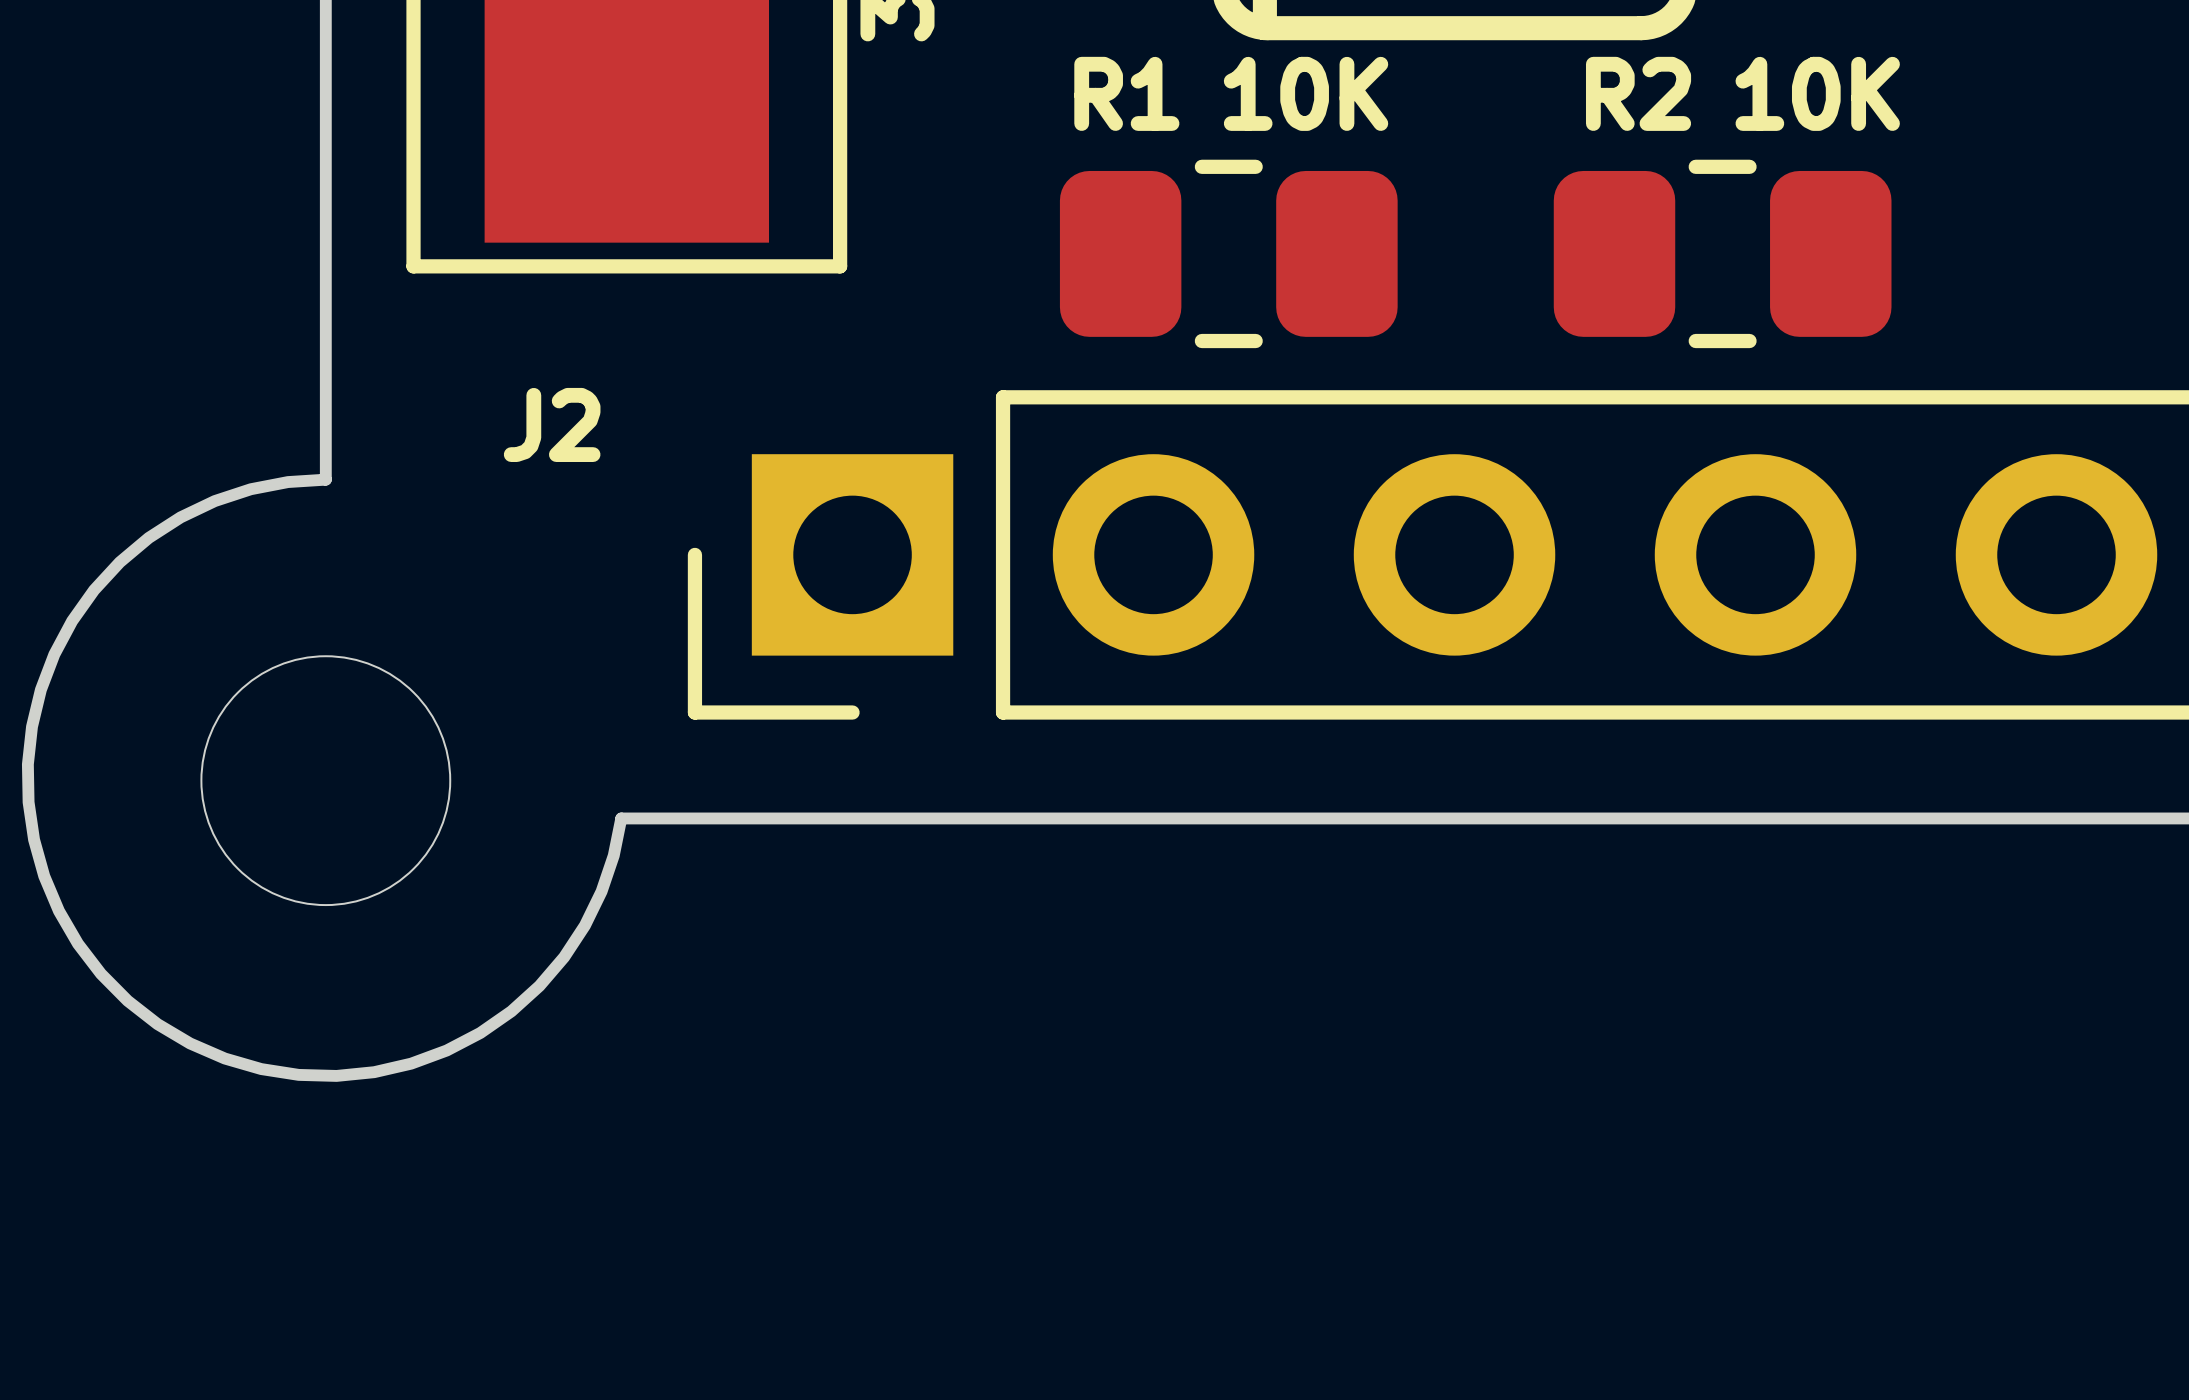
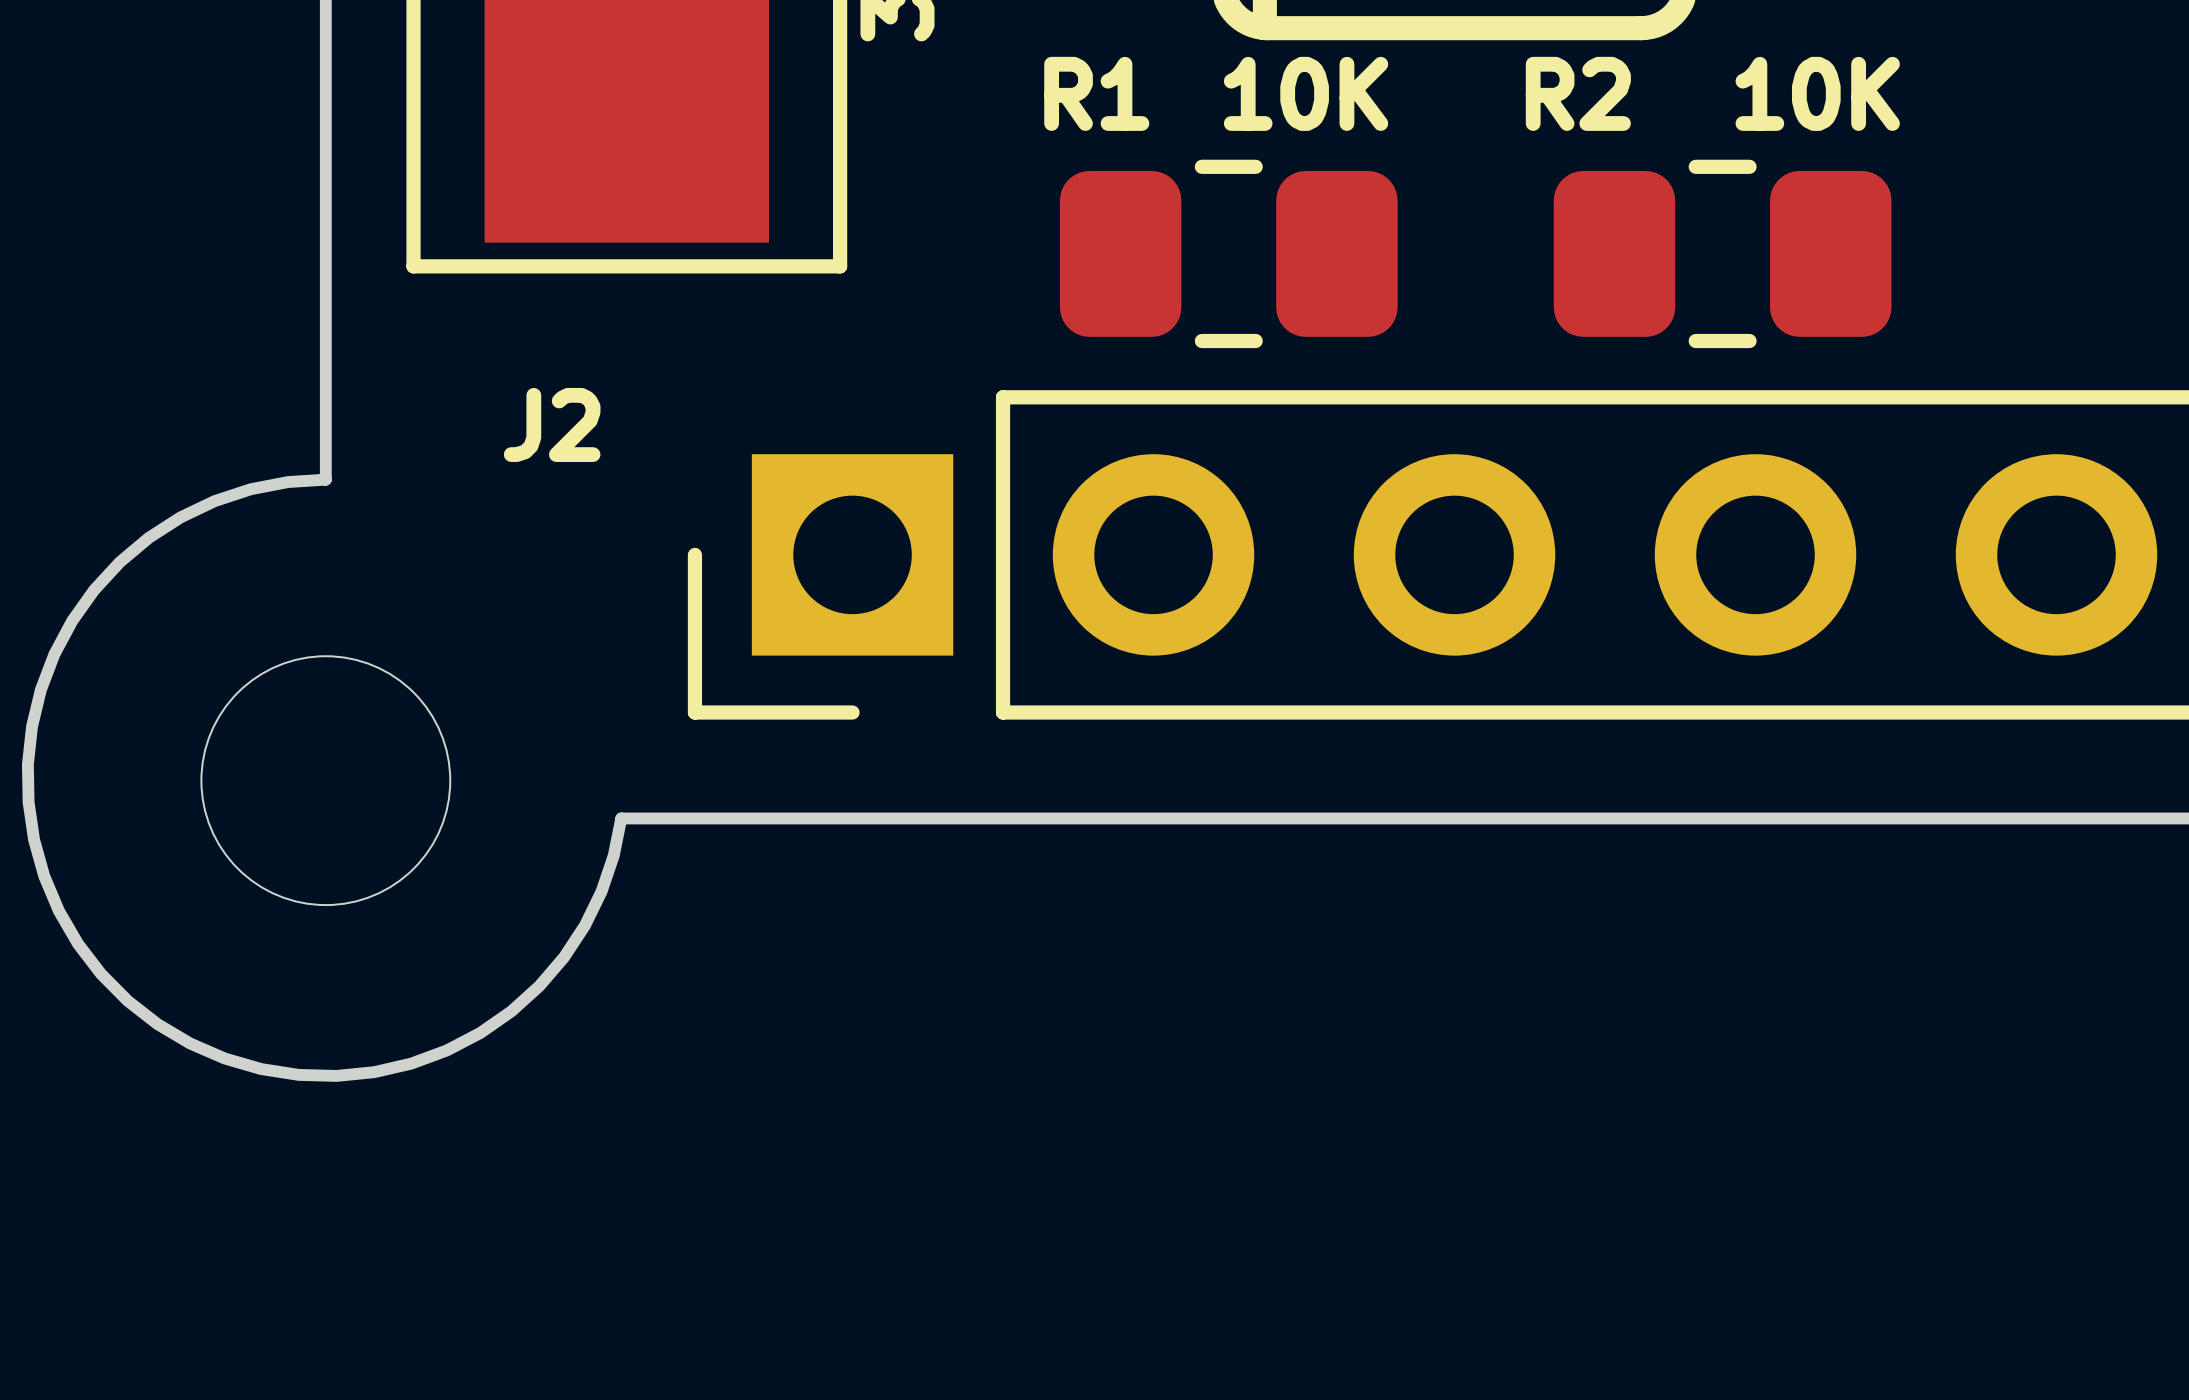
R1 name position: R1 (1126, 93) -> R1 (1096, 93)
R2 name position: R2 (1638, 93) -> R2 (1578, 93)

